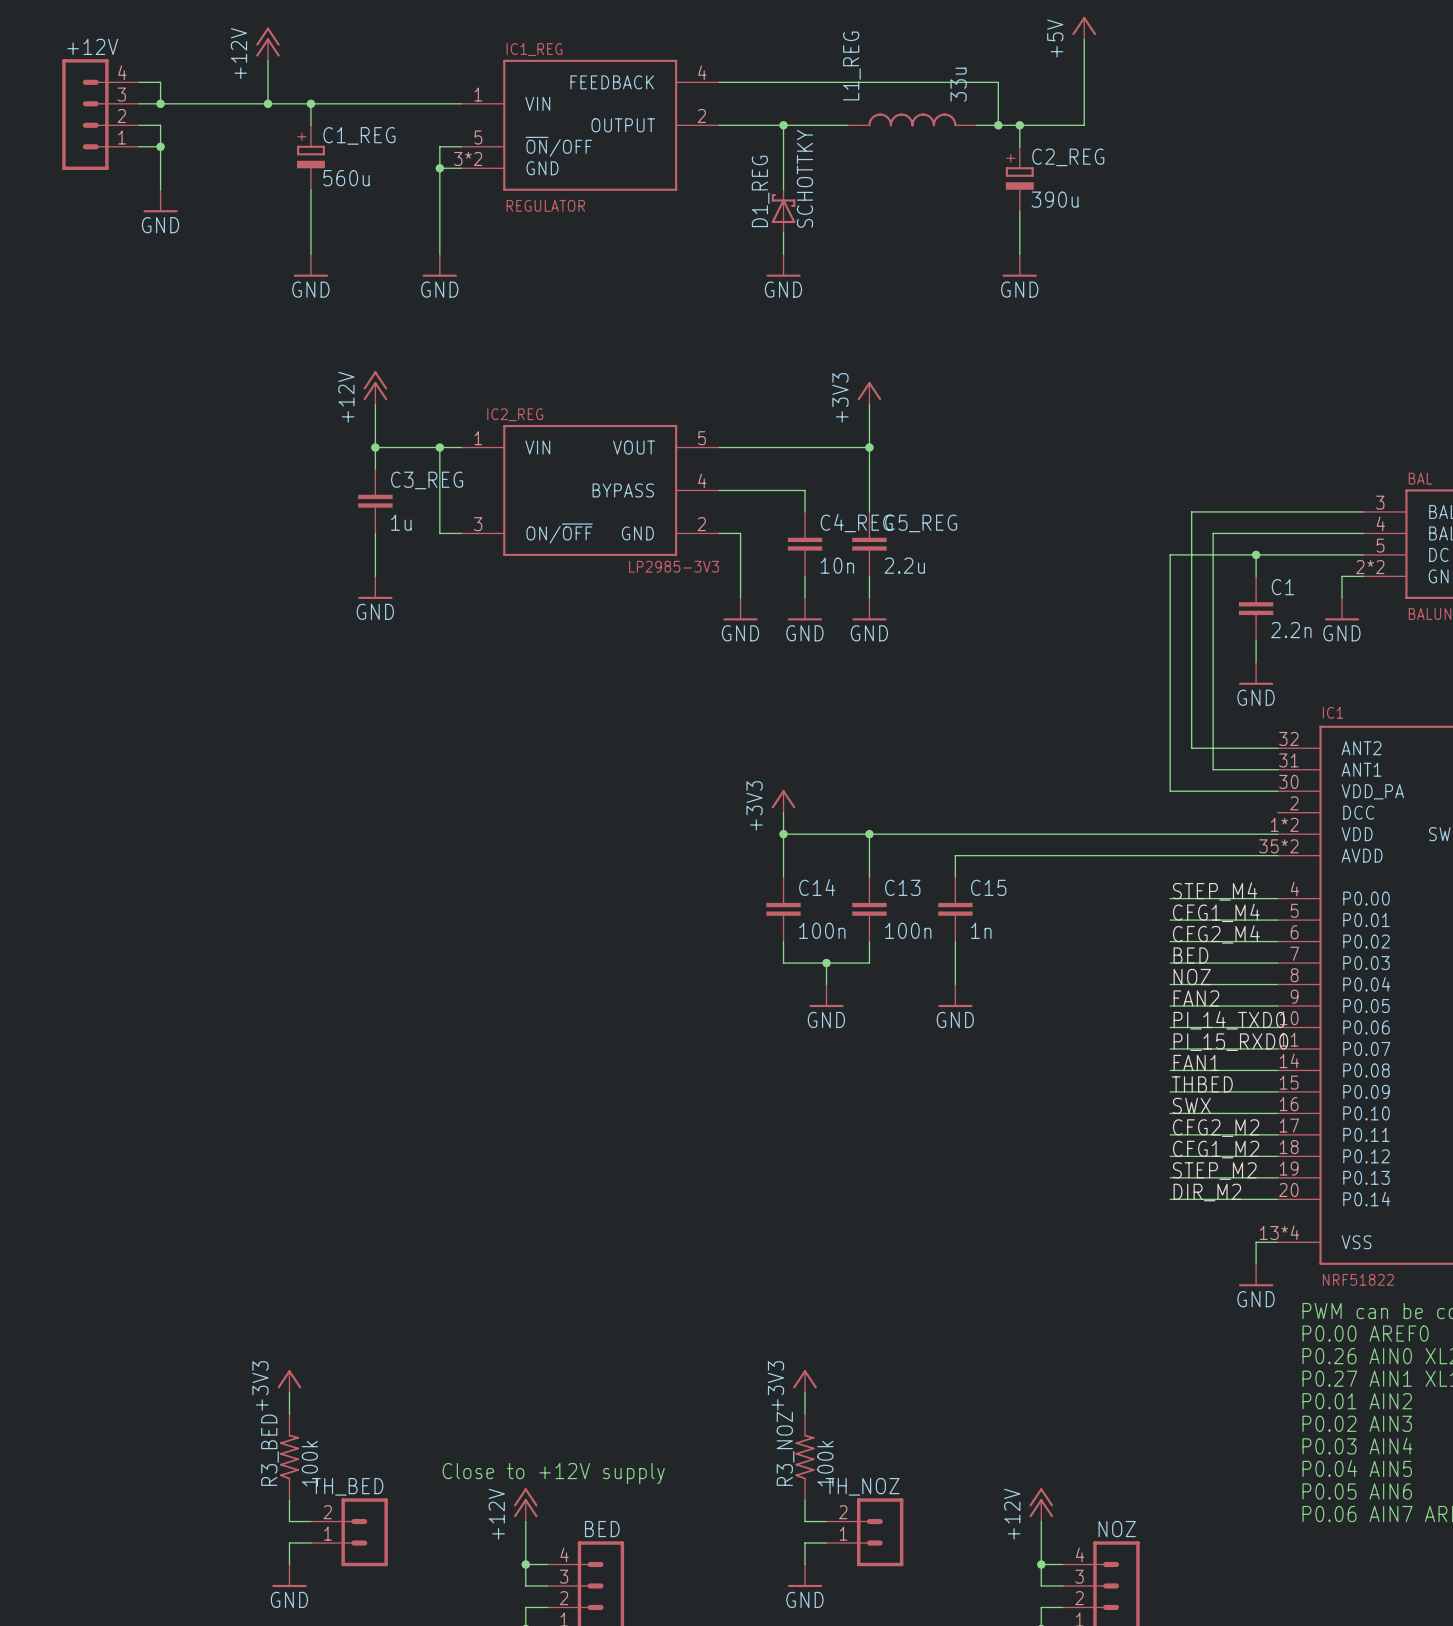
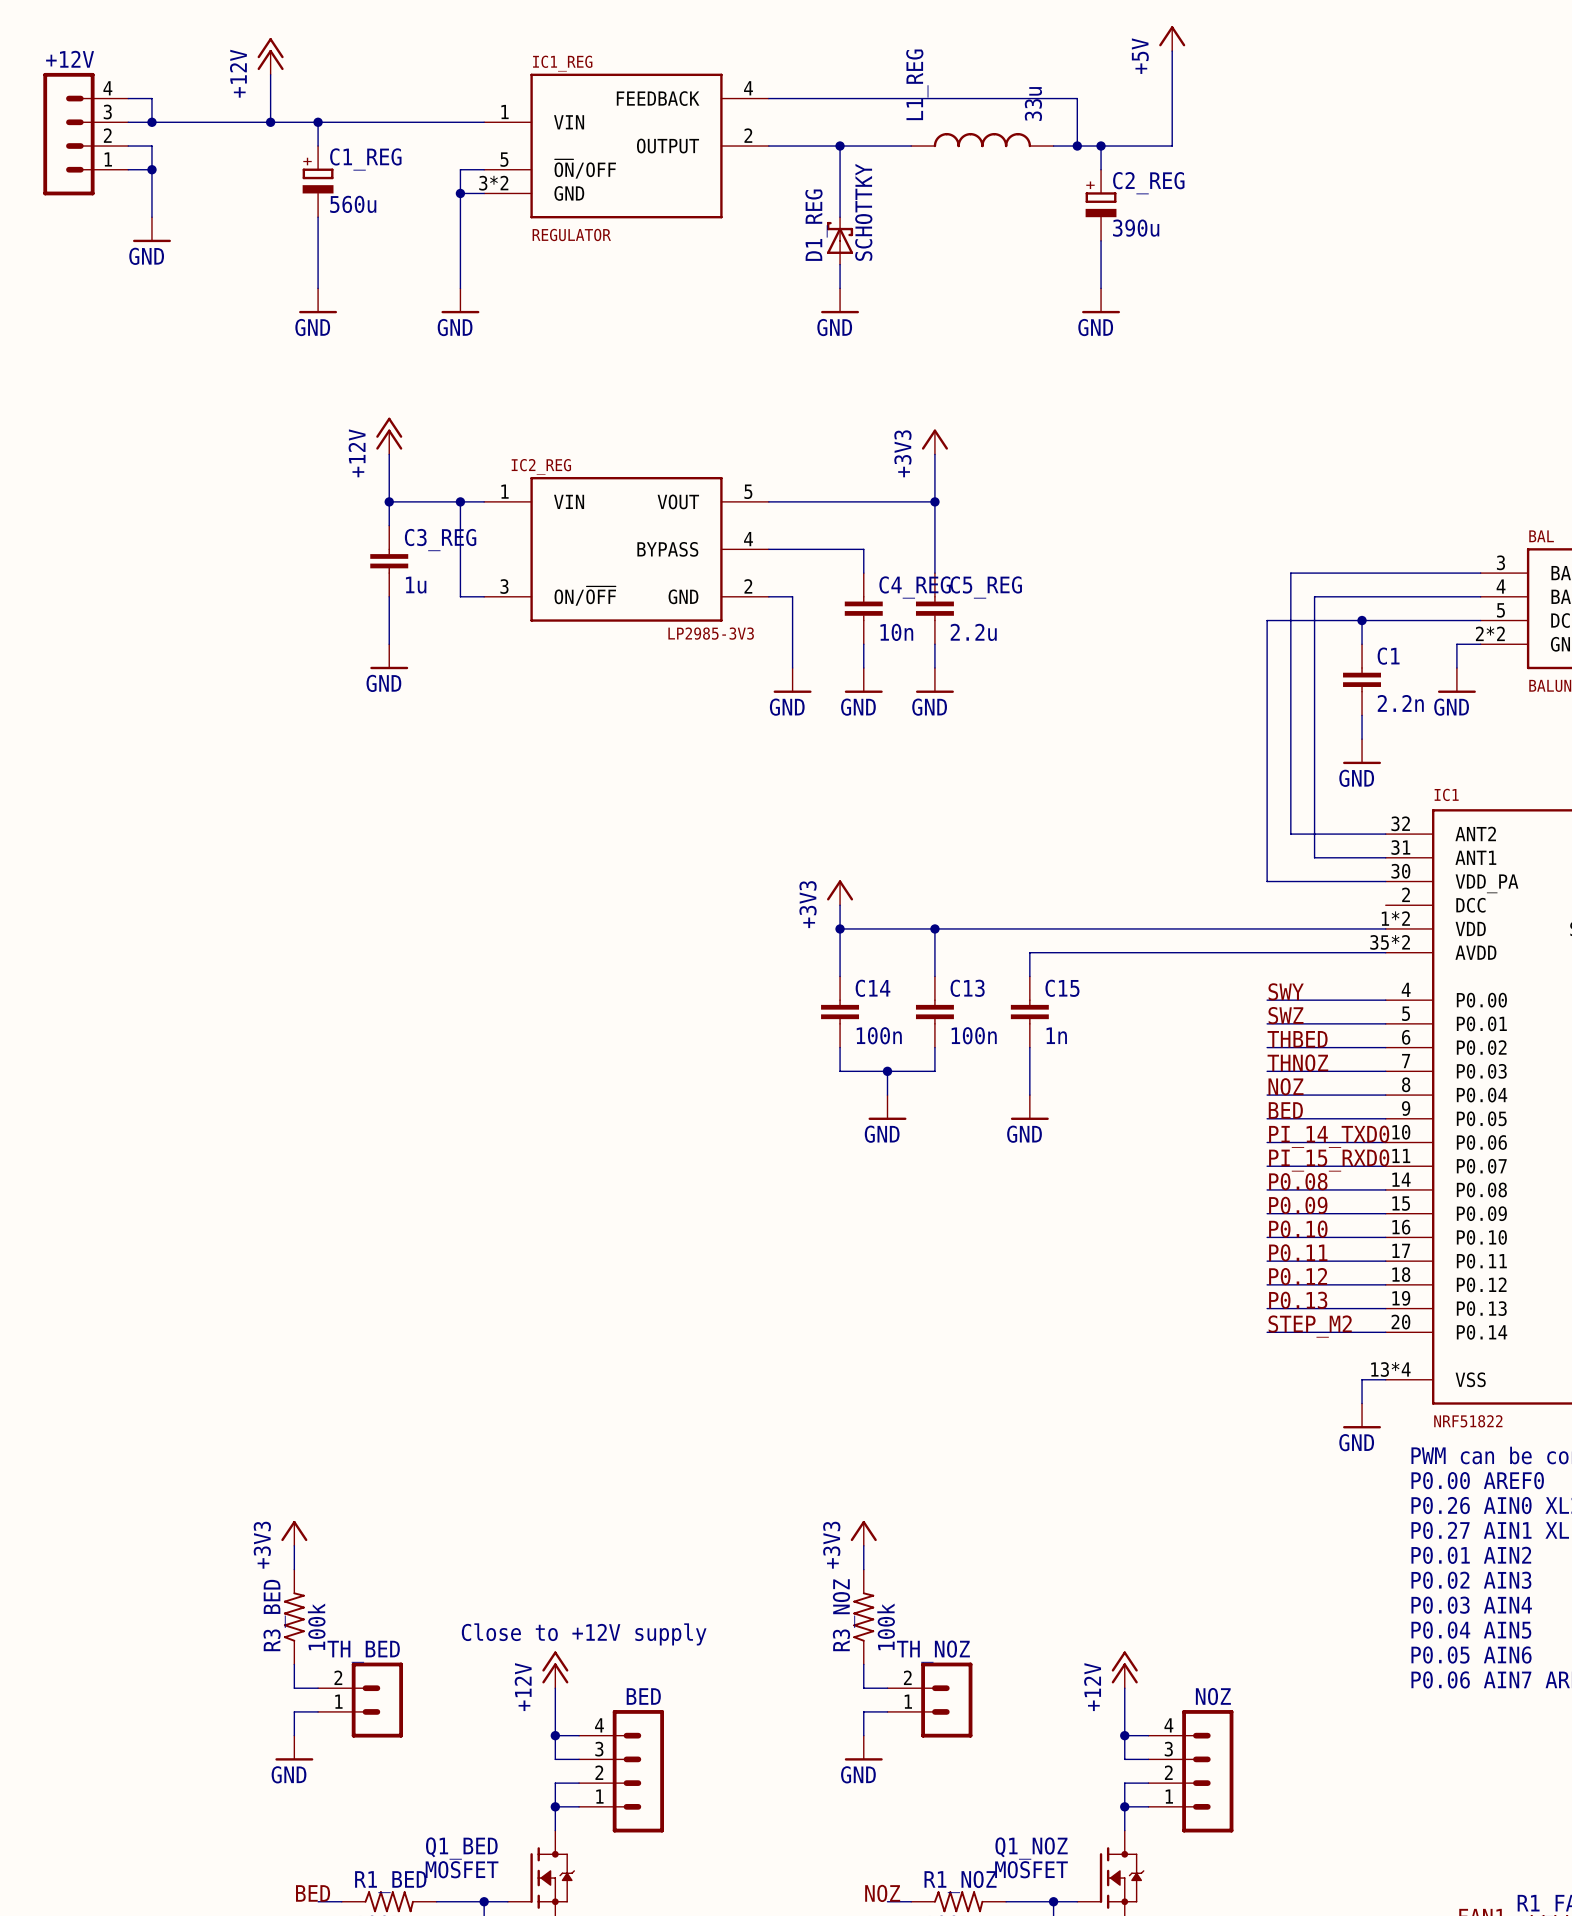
label: STEP_M4 (1215, 891) -> SWY (1286, 991)
label: CFG1_M4 (1216, 912) -> SWZ (1286, 1015)
label: CFG2_M4 (1216, 934) -> THBED (1297, 1039)
label: BED (1190, 955) -> THNOZ (1297, 1063)
label: FAN2 (1196, 998) -> BED (1285, 1110)
label: FAN1 (1196, 1062) -> P0.08 (1298, 1181)
label: THBED (1202, 1084) -> P0.09 (1298, 1205)
label: SWX (1191, 1105) -> P0.10 (1298, 1229)
label: CFG2_M2 (1216, 1128) -> P0.11 (1298, 1252)
label: CFG1_M2 (1216, 1149) -> P0.12 (1298, 1276)
label: STEP_M2 (1214, 1171) -> P0.13 (1298, 1300)
label: DIR_M2 (1207, 1192) -> STEP_M2 (1310, 1326)

